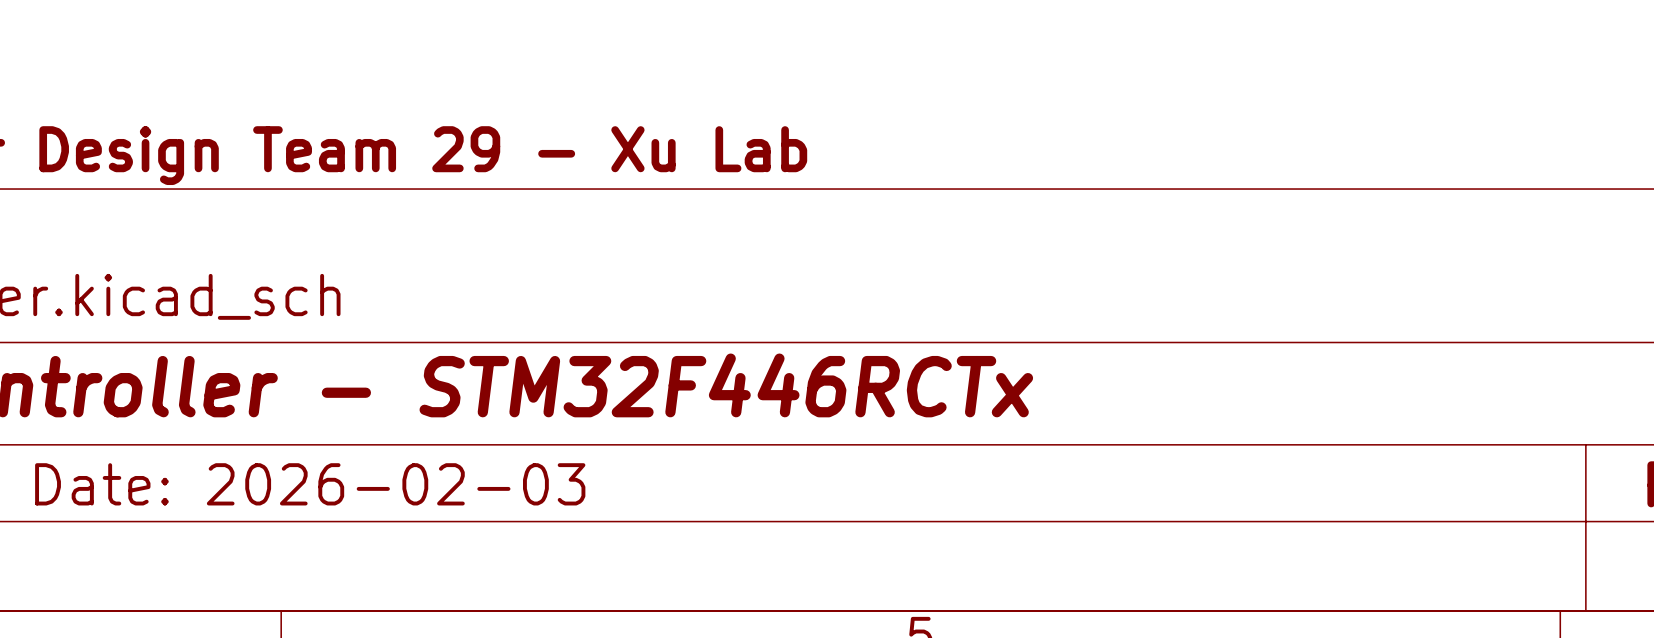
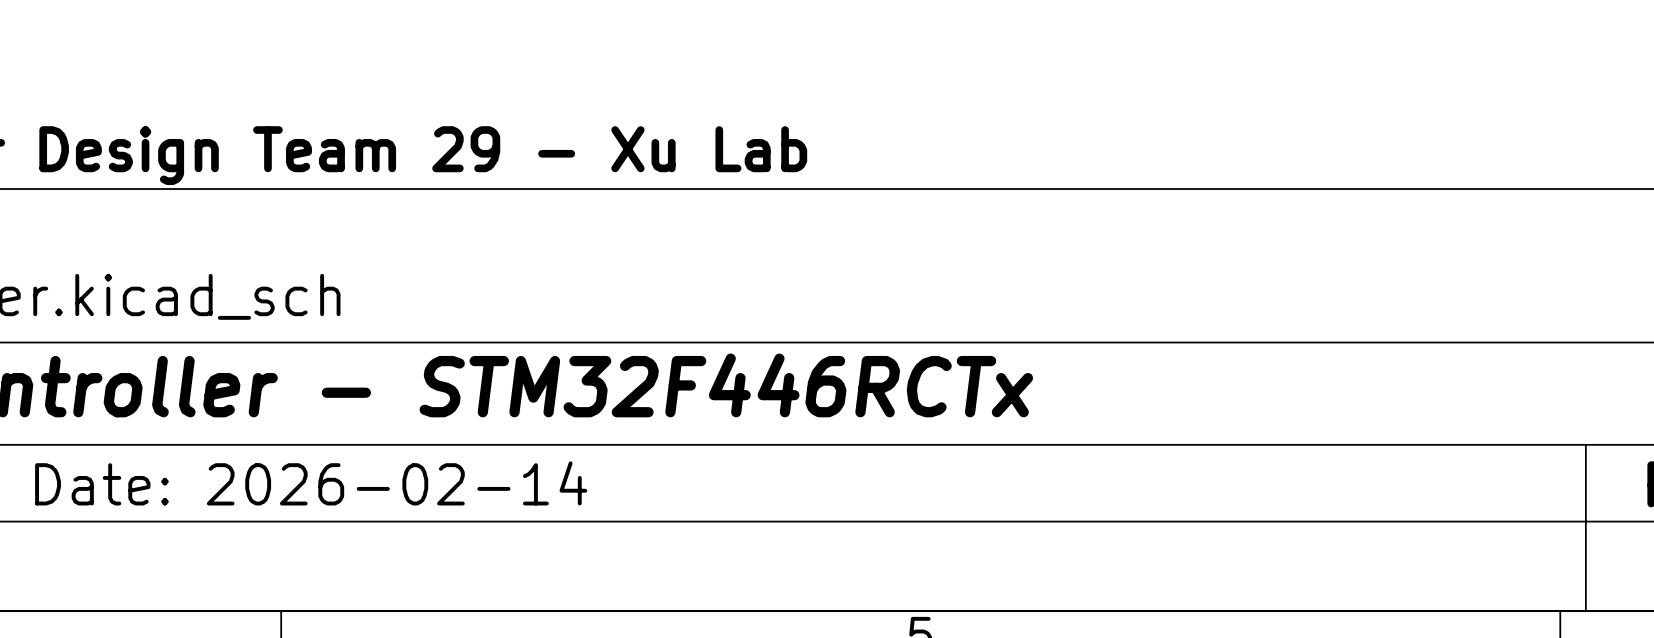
title block: Date: 2026-02-03 (310, 484) -> Date: 2026-02-14 (311, 483)

